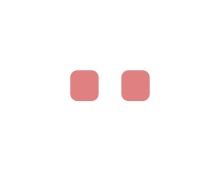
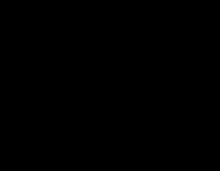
part: (109, 85) -> none

